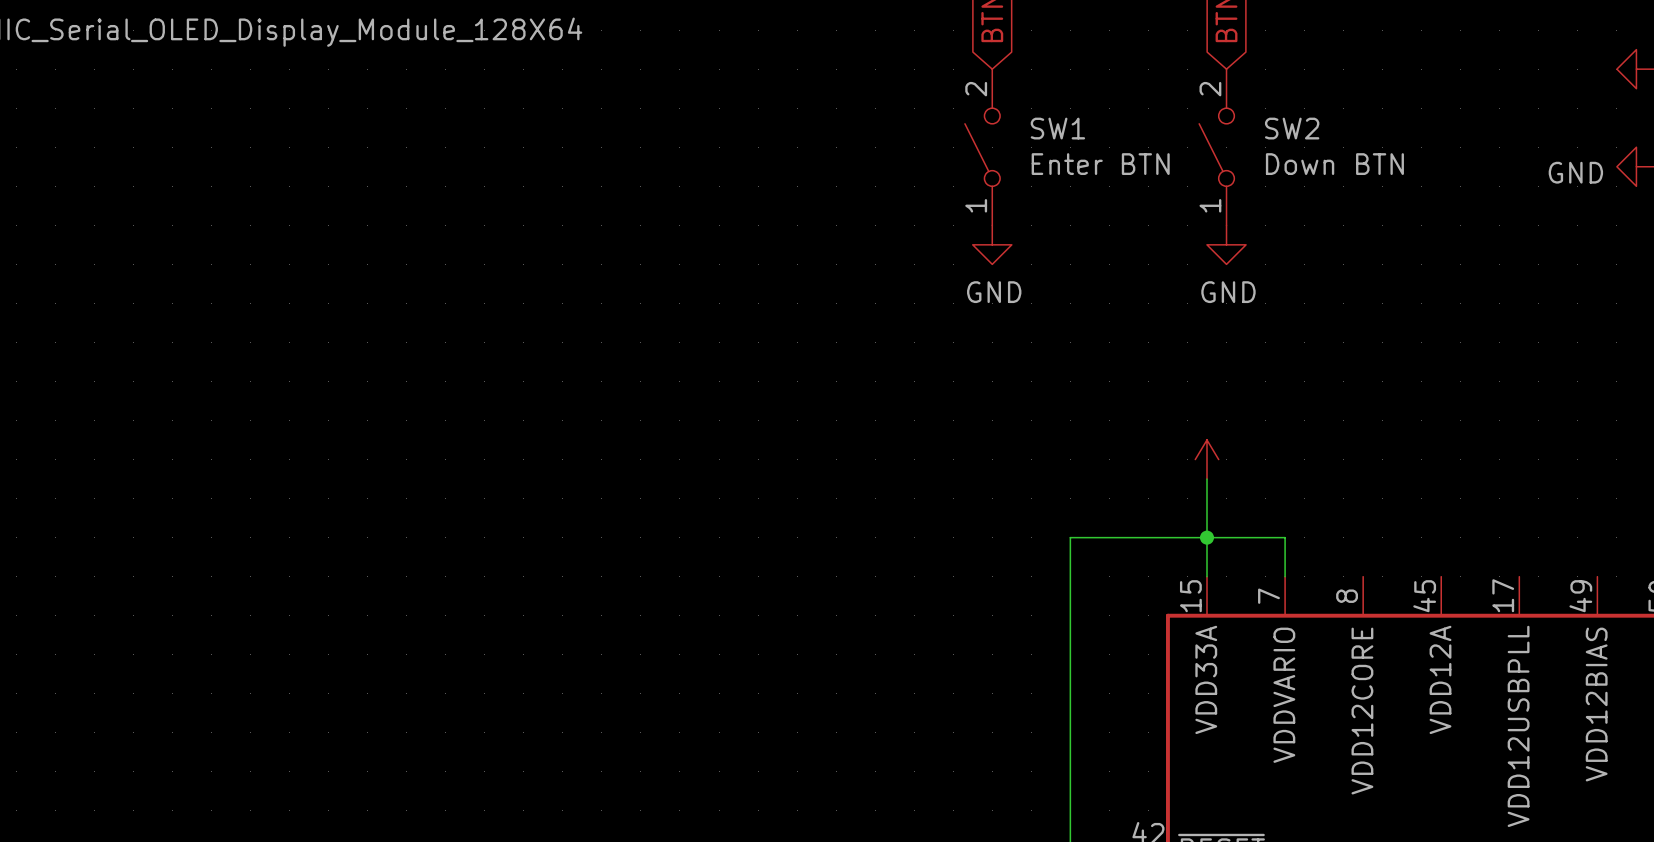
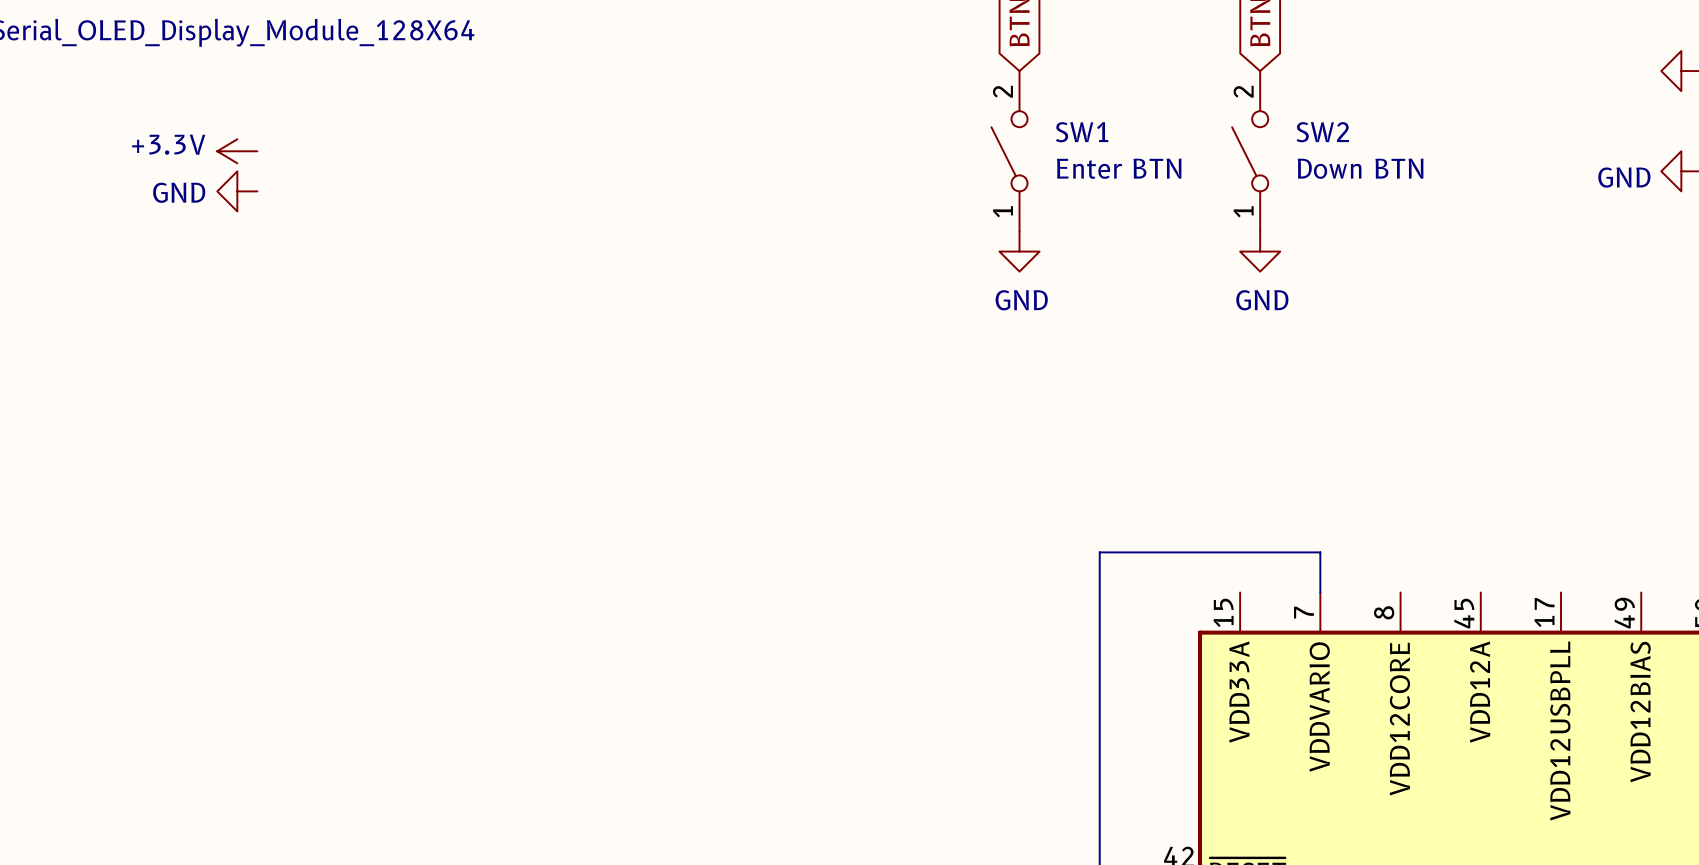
power symbol: none -> +3.3V (237, 151)
power symbol: none -> GND (237, 191)
power symbol: (1206, 459) -> none
wire: (1206, 479) (1206, 576) -> none
junction: (1206, 537) -> none

